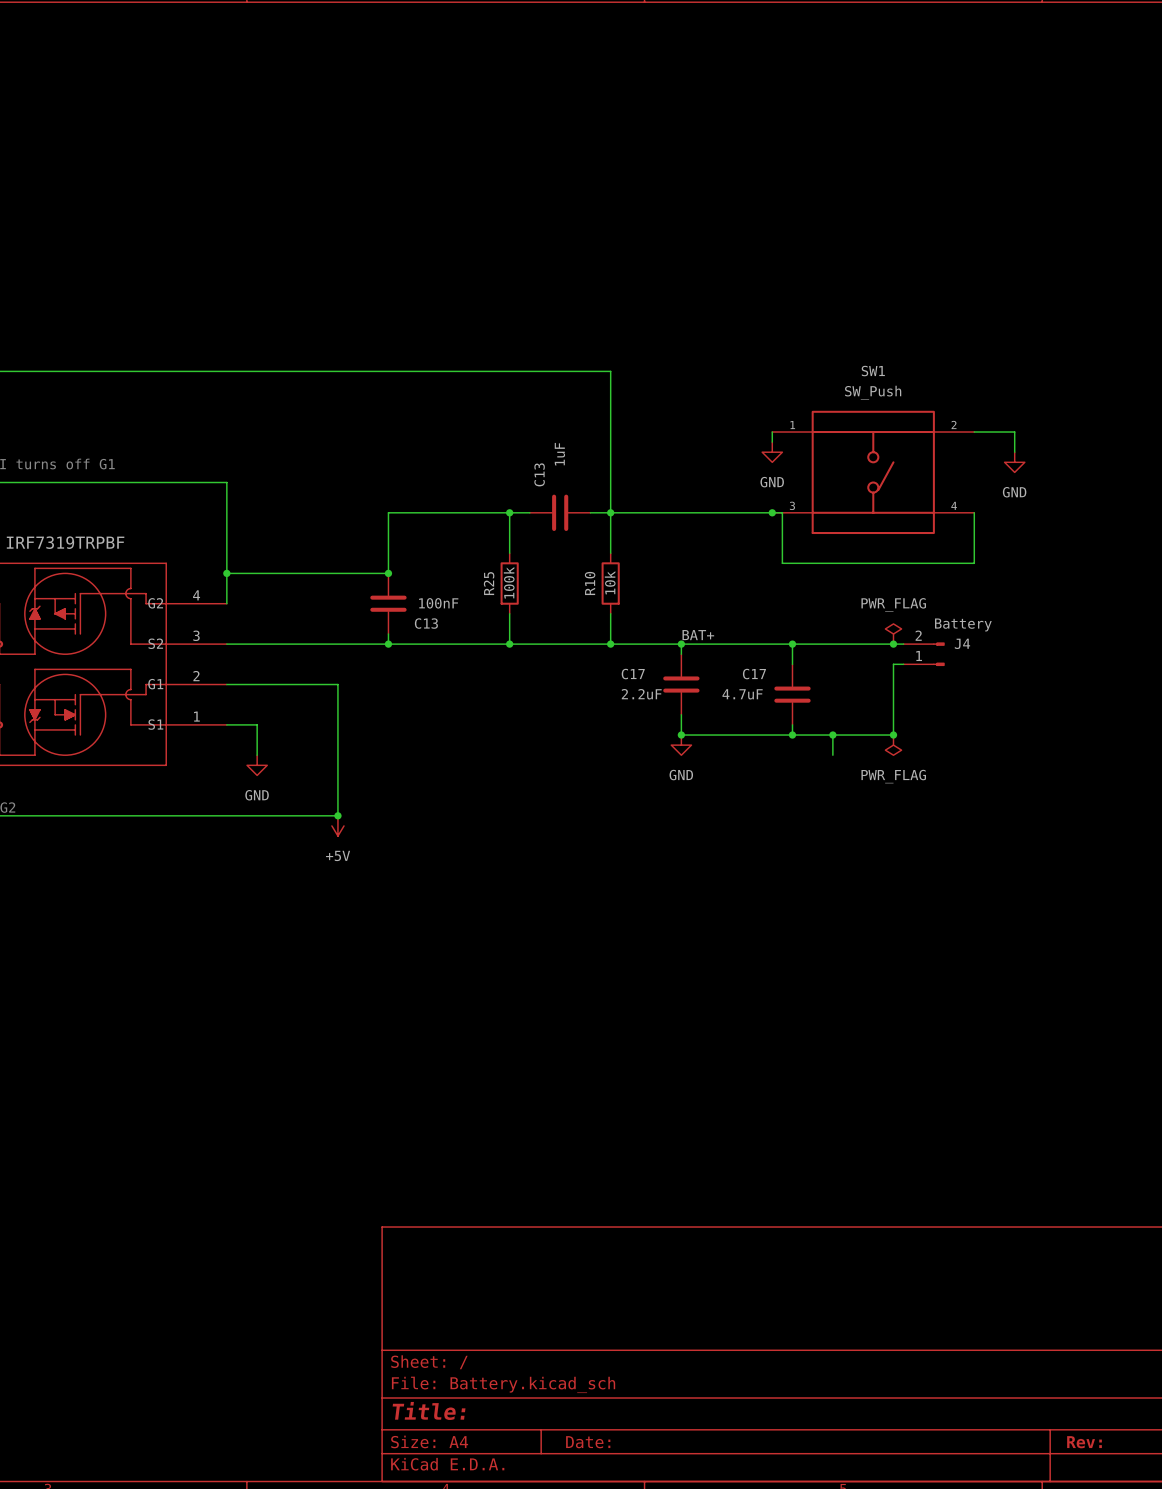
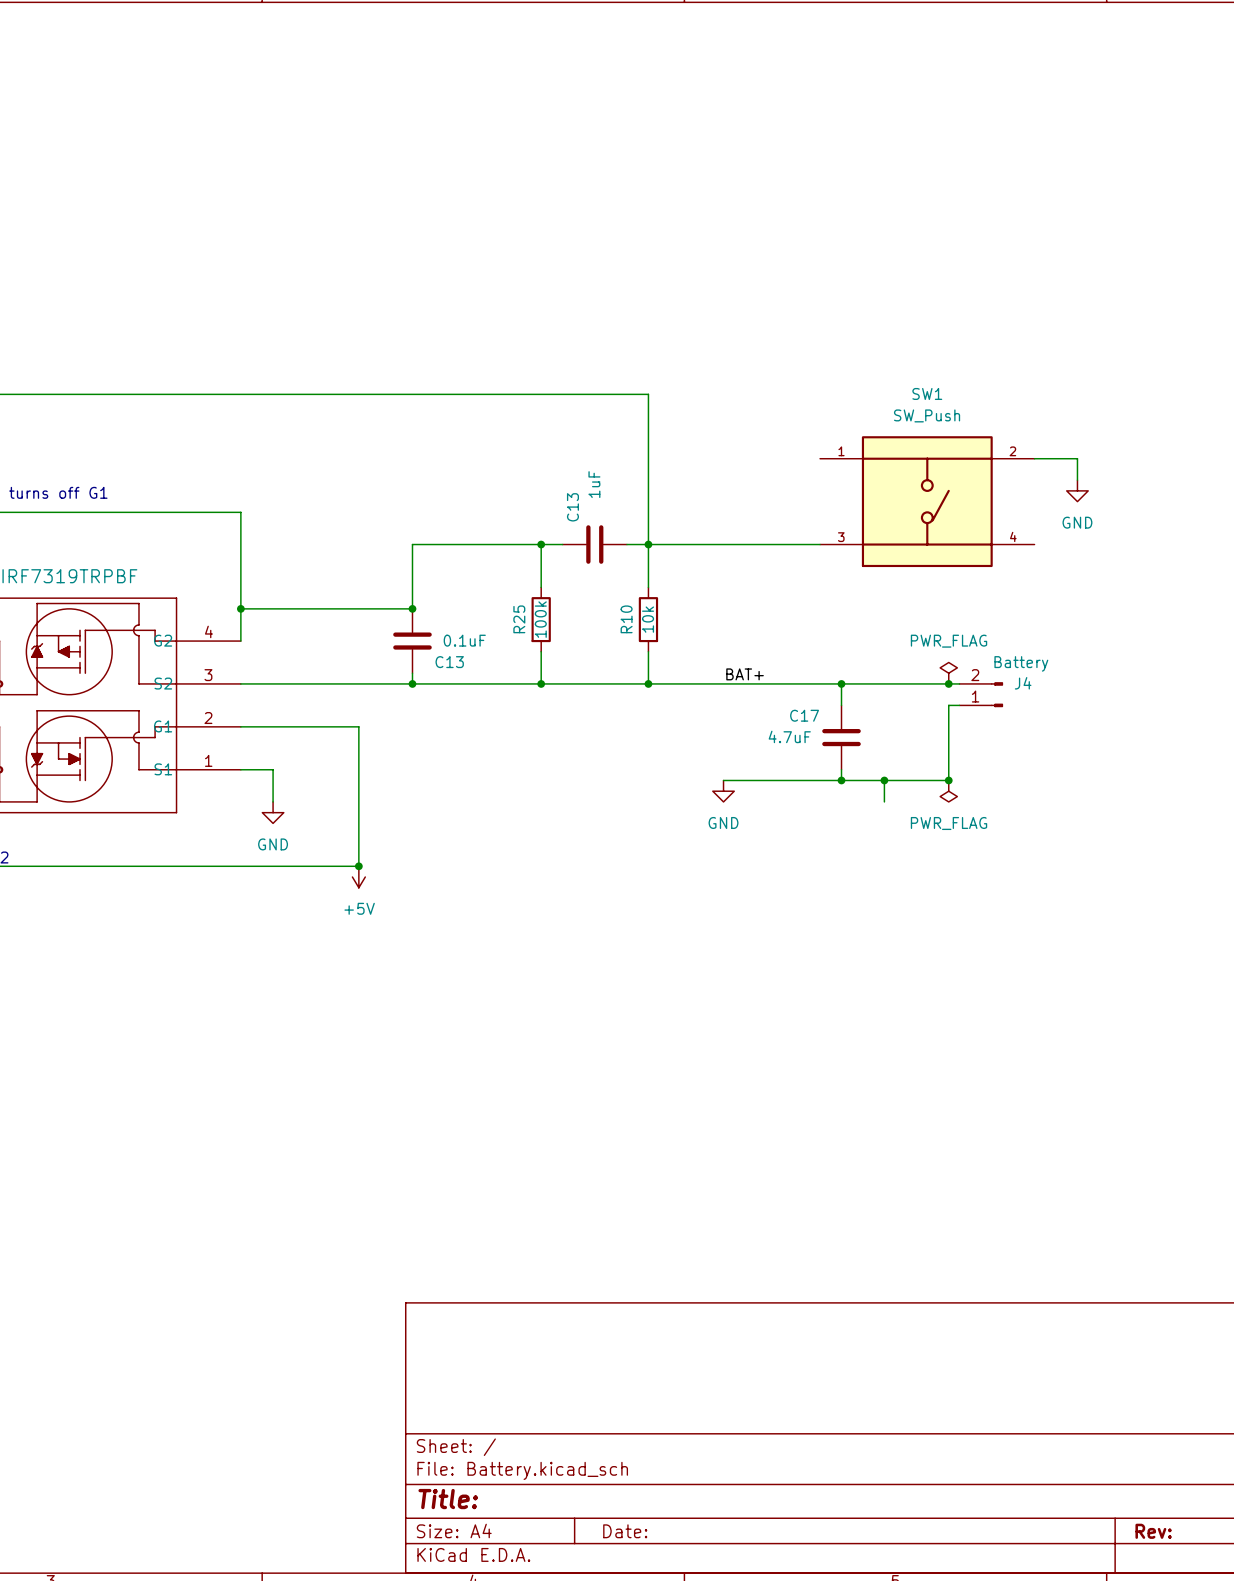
wire: (772, 432) (772, 442) -> none
power symbol: GND (772, 452) -> none
wire: (772, 512) (782, 512) (782, 563) (974, 563) (974, 512) -> none
junction: (772, 512) -> none
C13 value: 100nF (438, 603) -> 0.1uF (464, 640)
wire: (681, 644) (681, 654) -> none
junction: (681, 644) -> none
C17: 2.2uF (681, 684) -> none
wire: (681, 714) (681, 735) -> none
junction: (681, 735) -> none

